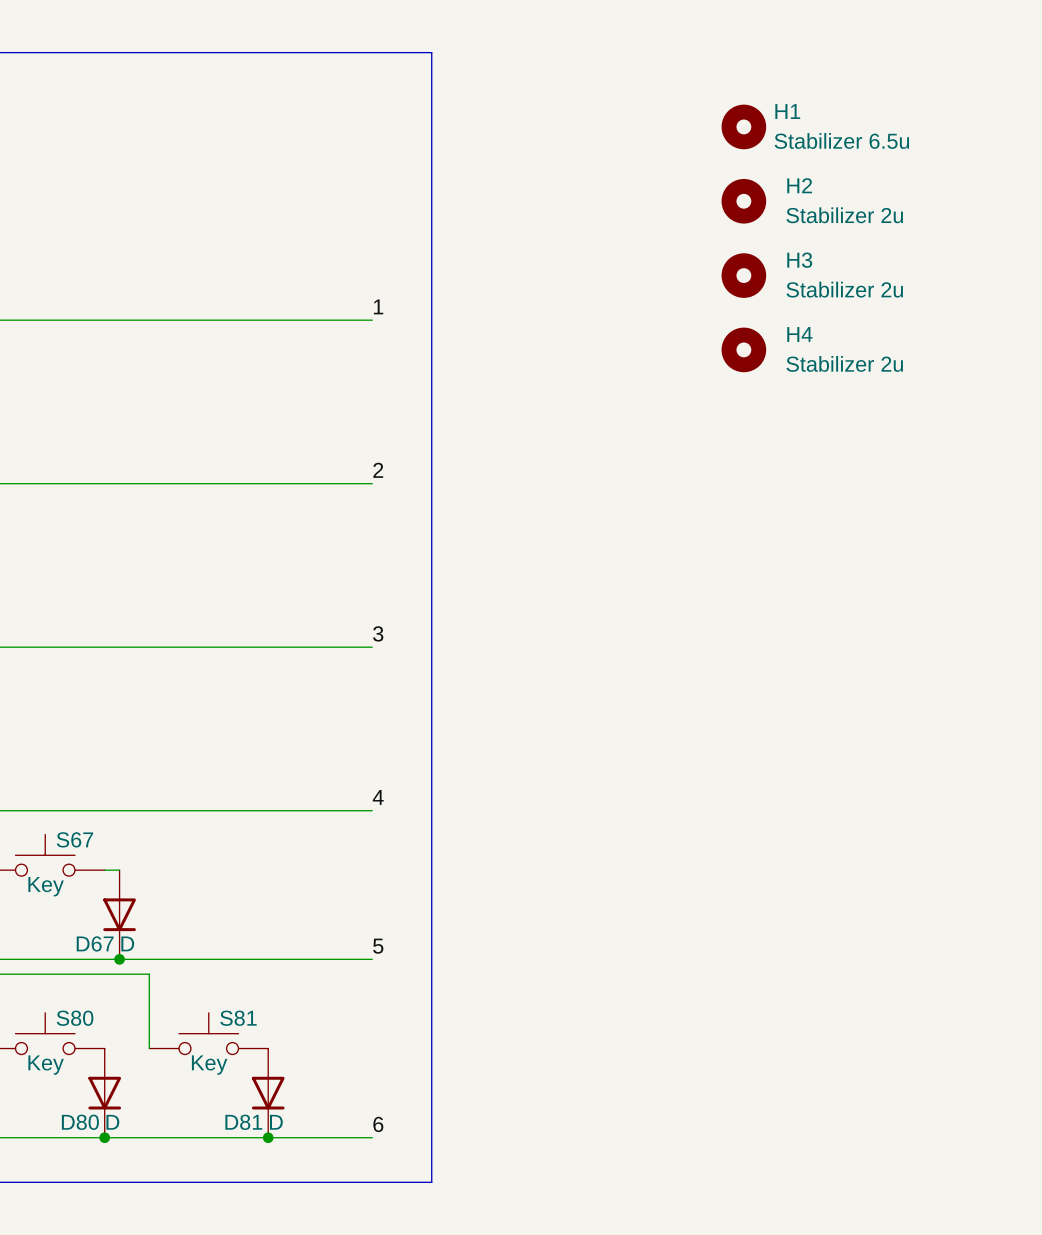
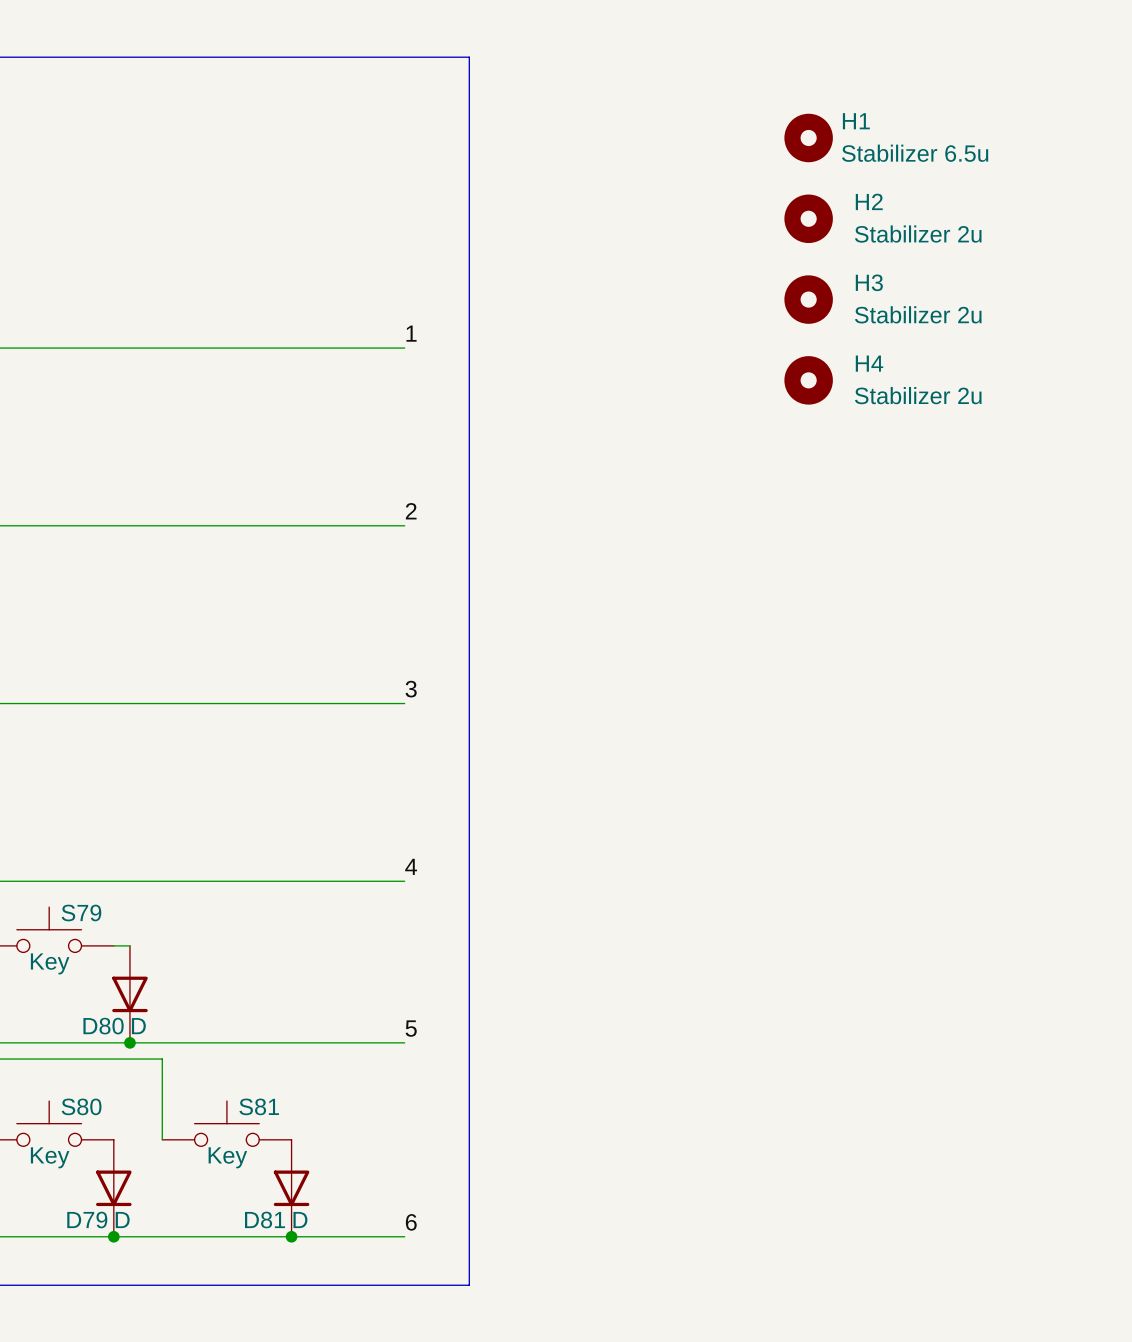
S67 name: S67 (74, 839) -> S79 (81, 912)
D67 name: D67 (95, 943) -> D80 (103, 1026)
D80 name: D80 (80, 1122) -> D79 (87, 1220)

